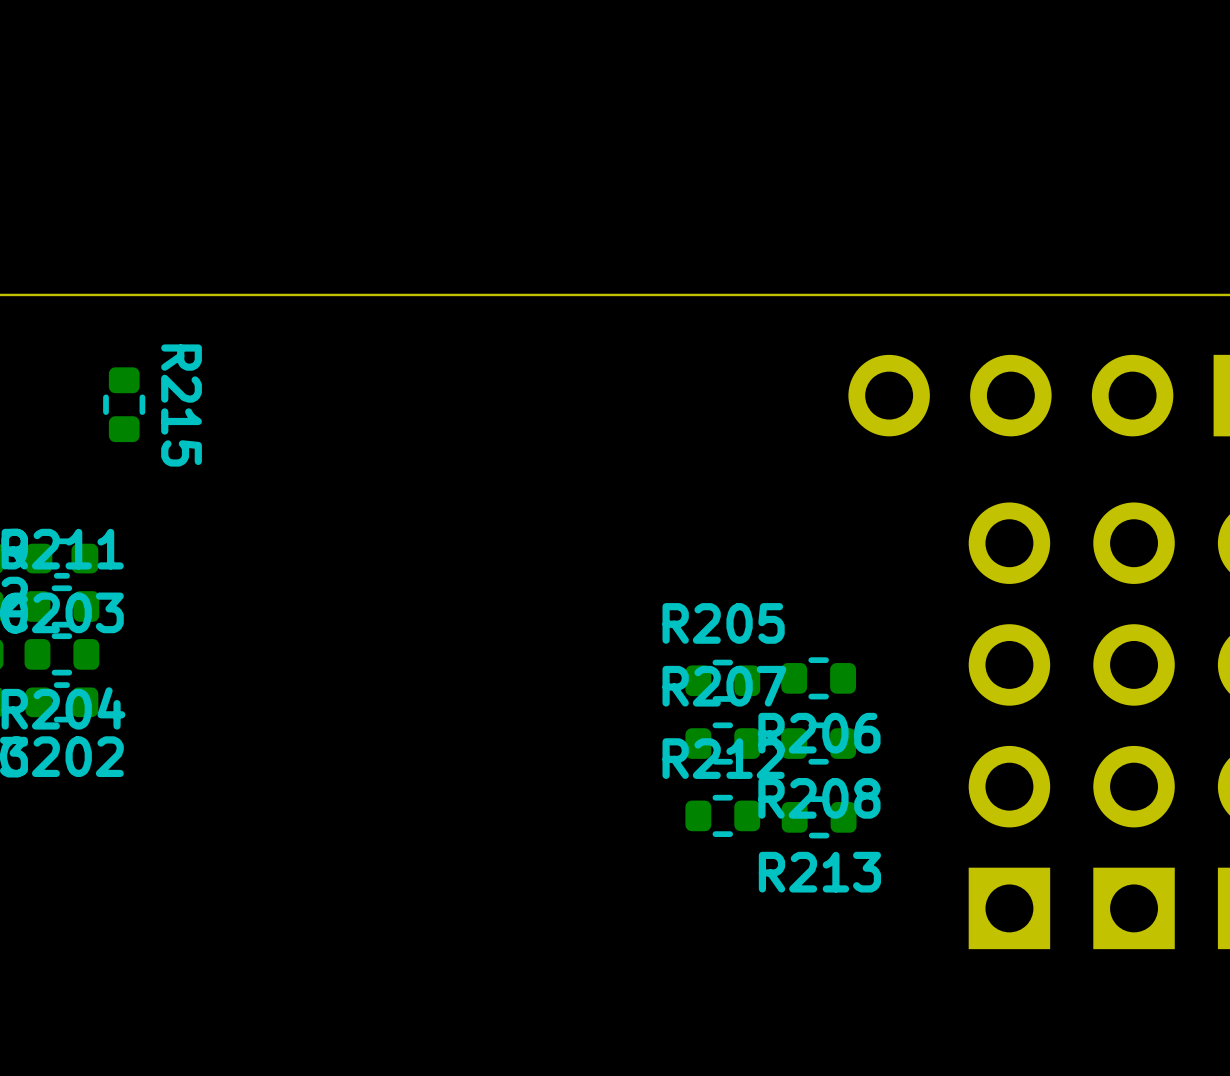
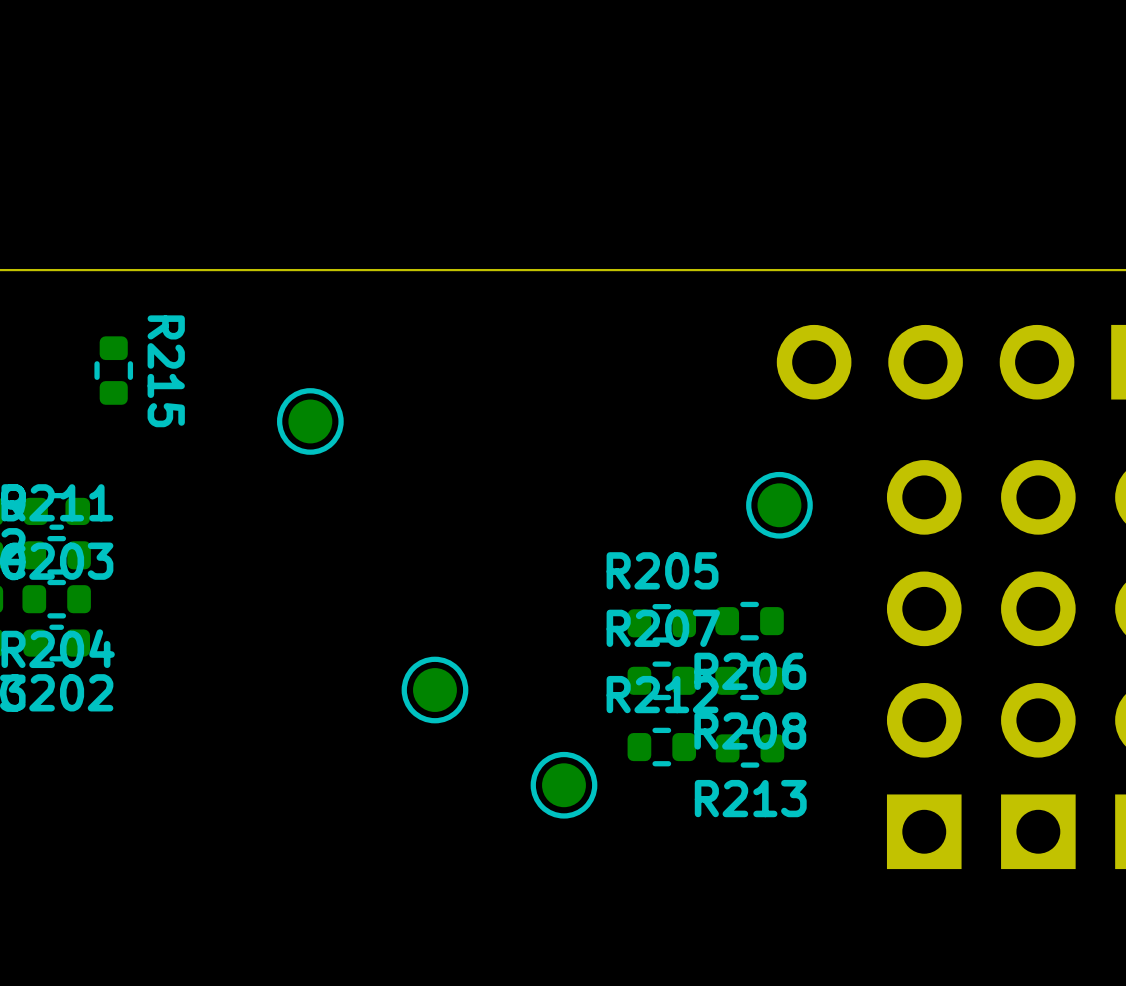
part: none -> (310, 421)
part: none -> (779, 505)
part: none -> (434, 690)
part: none -> (563, 785)

